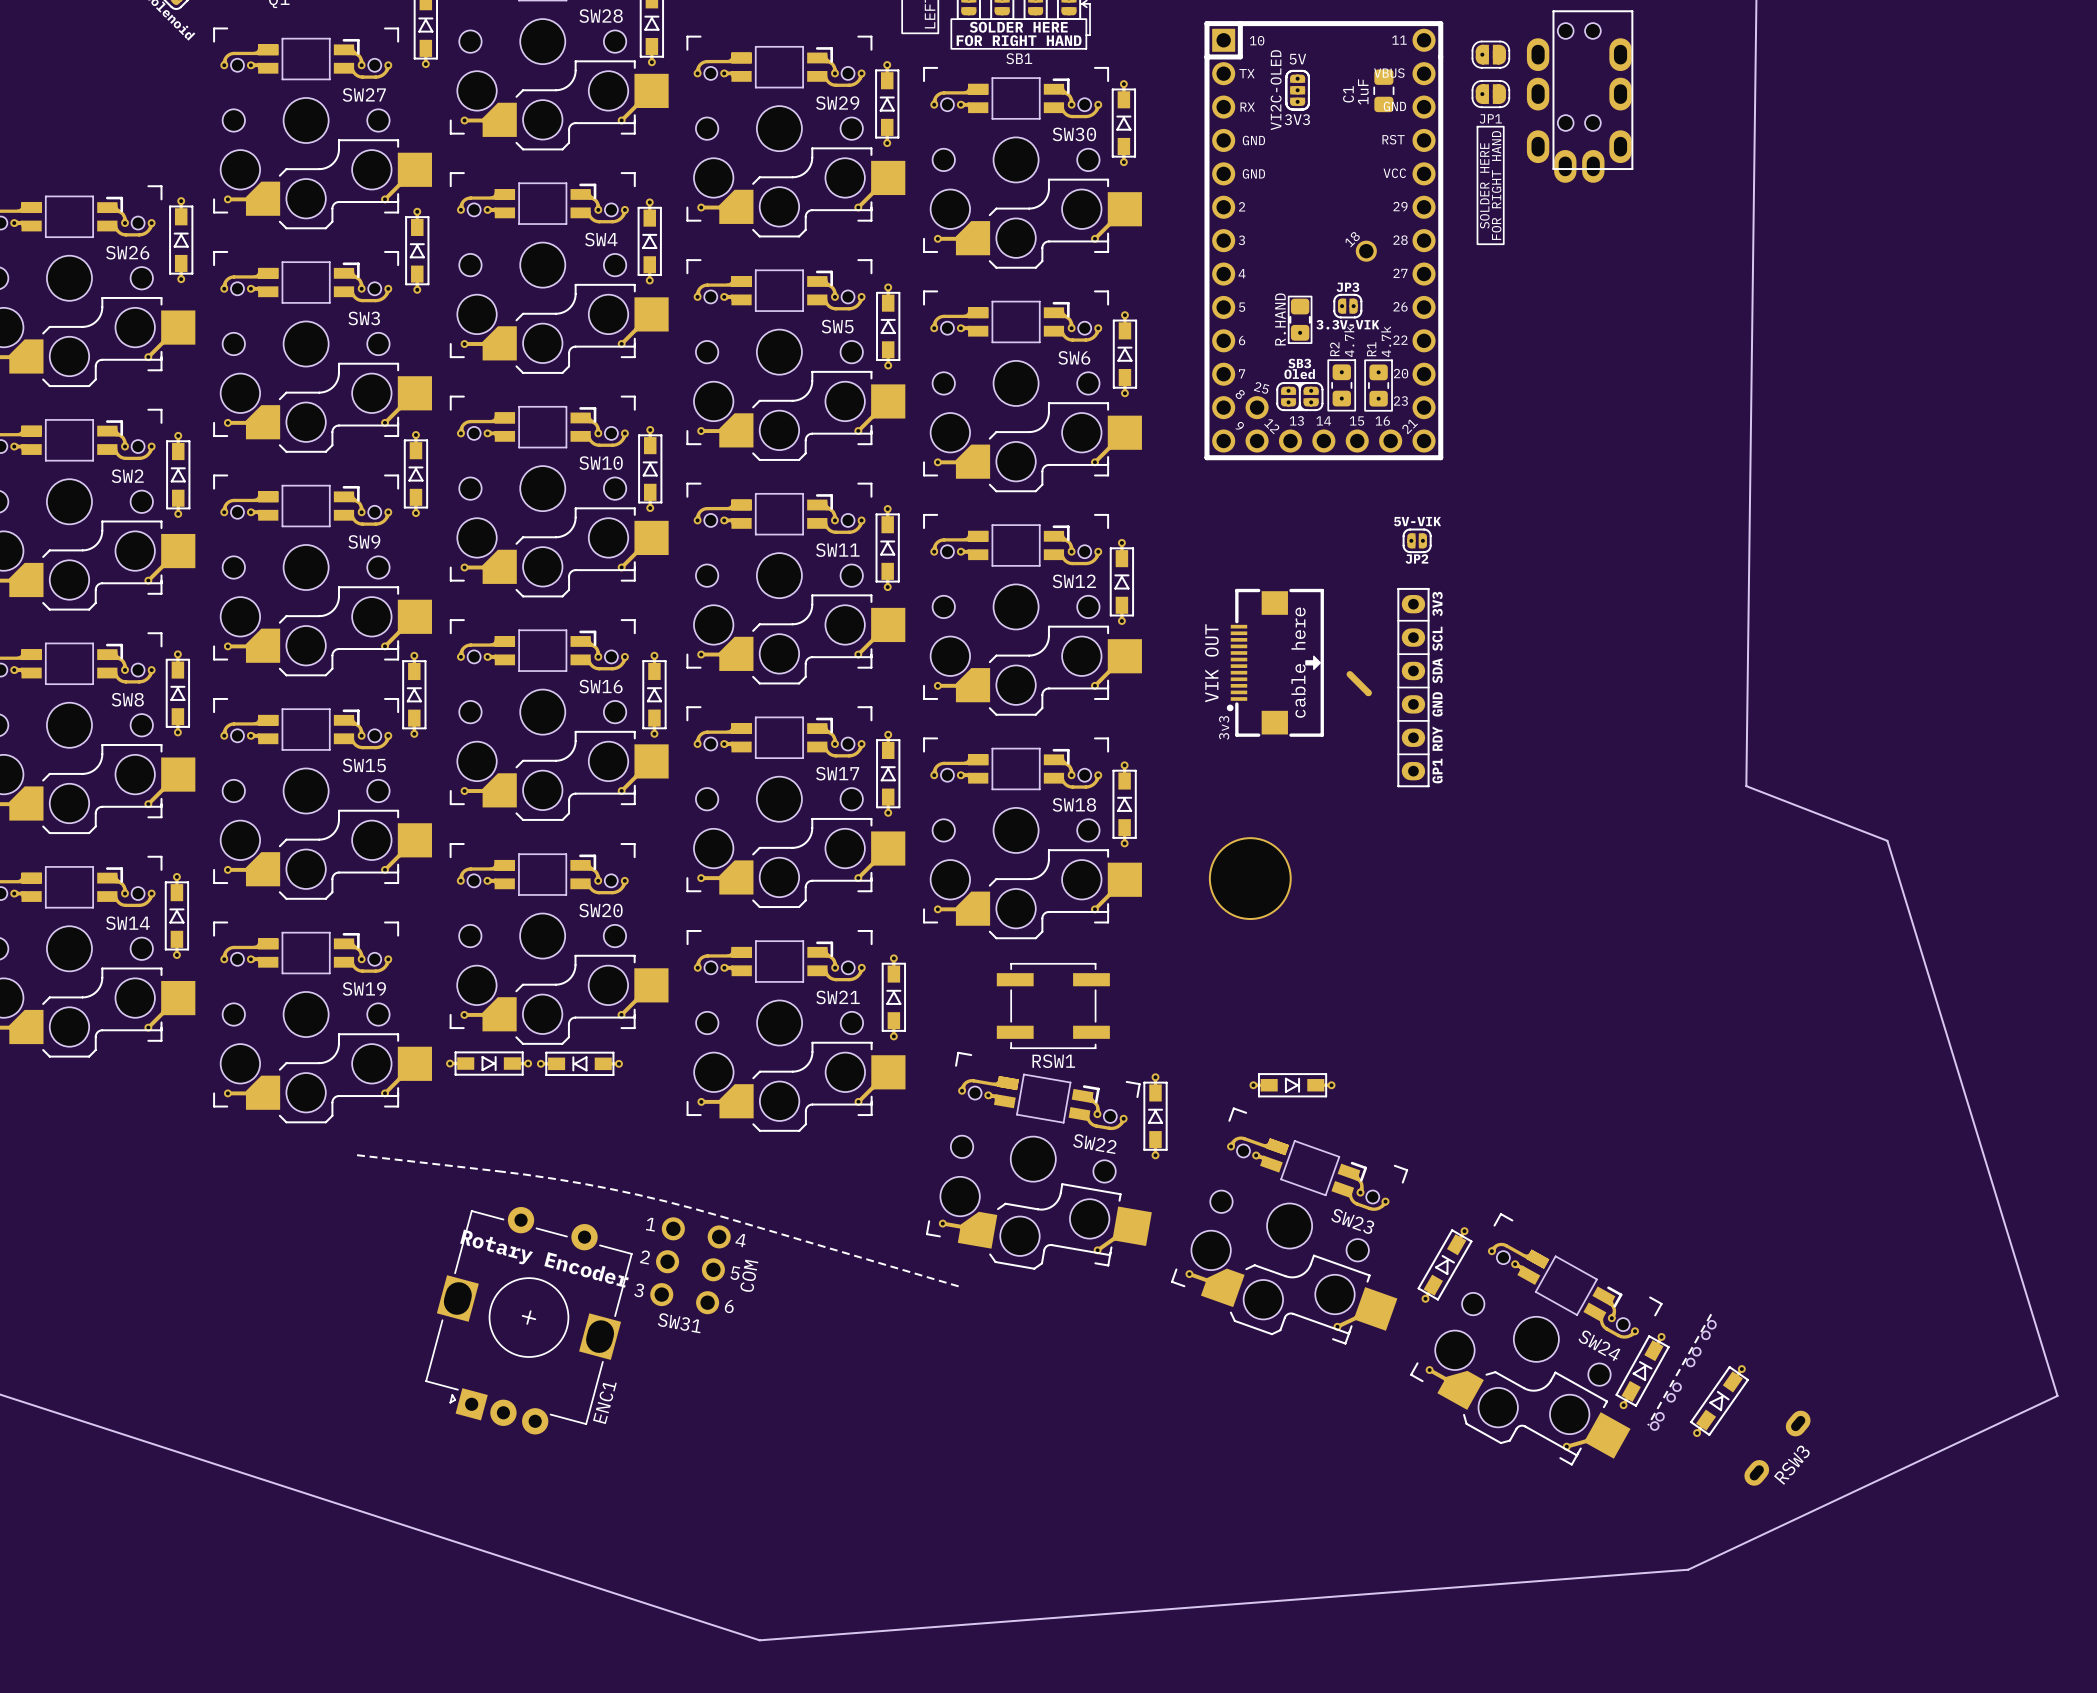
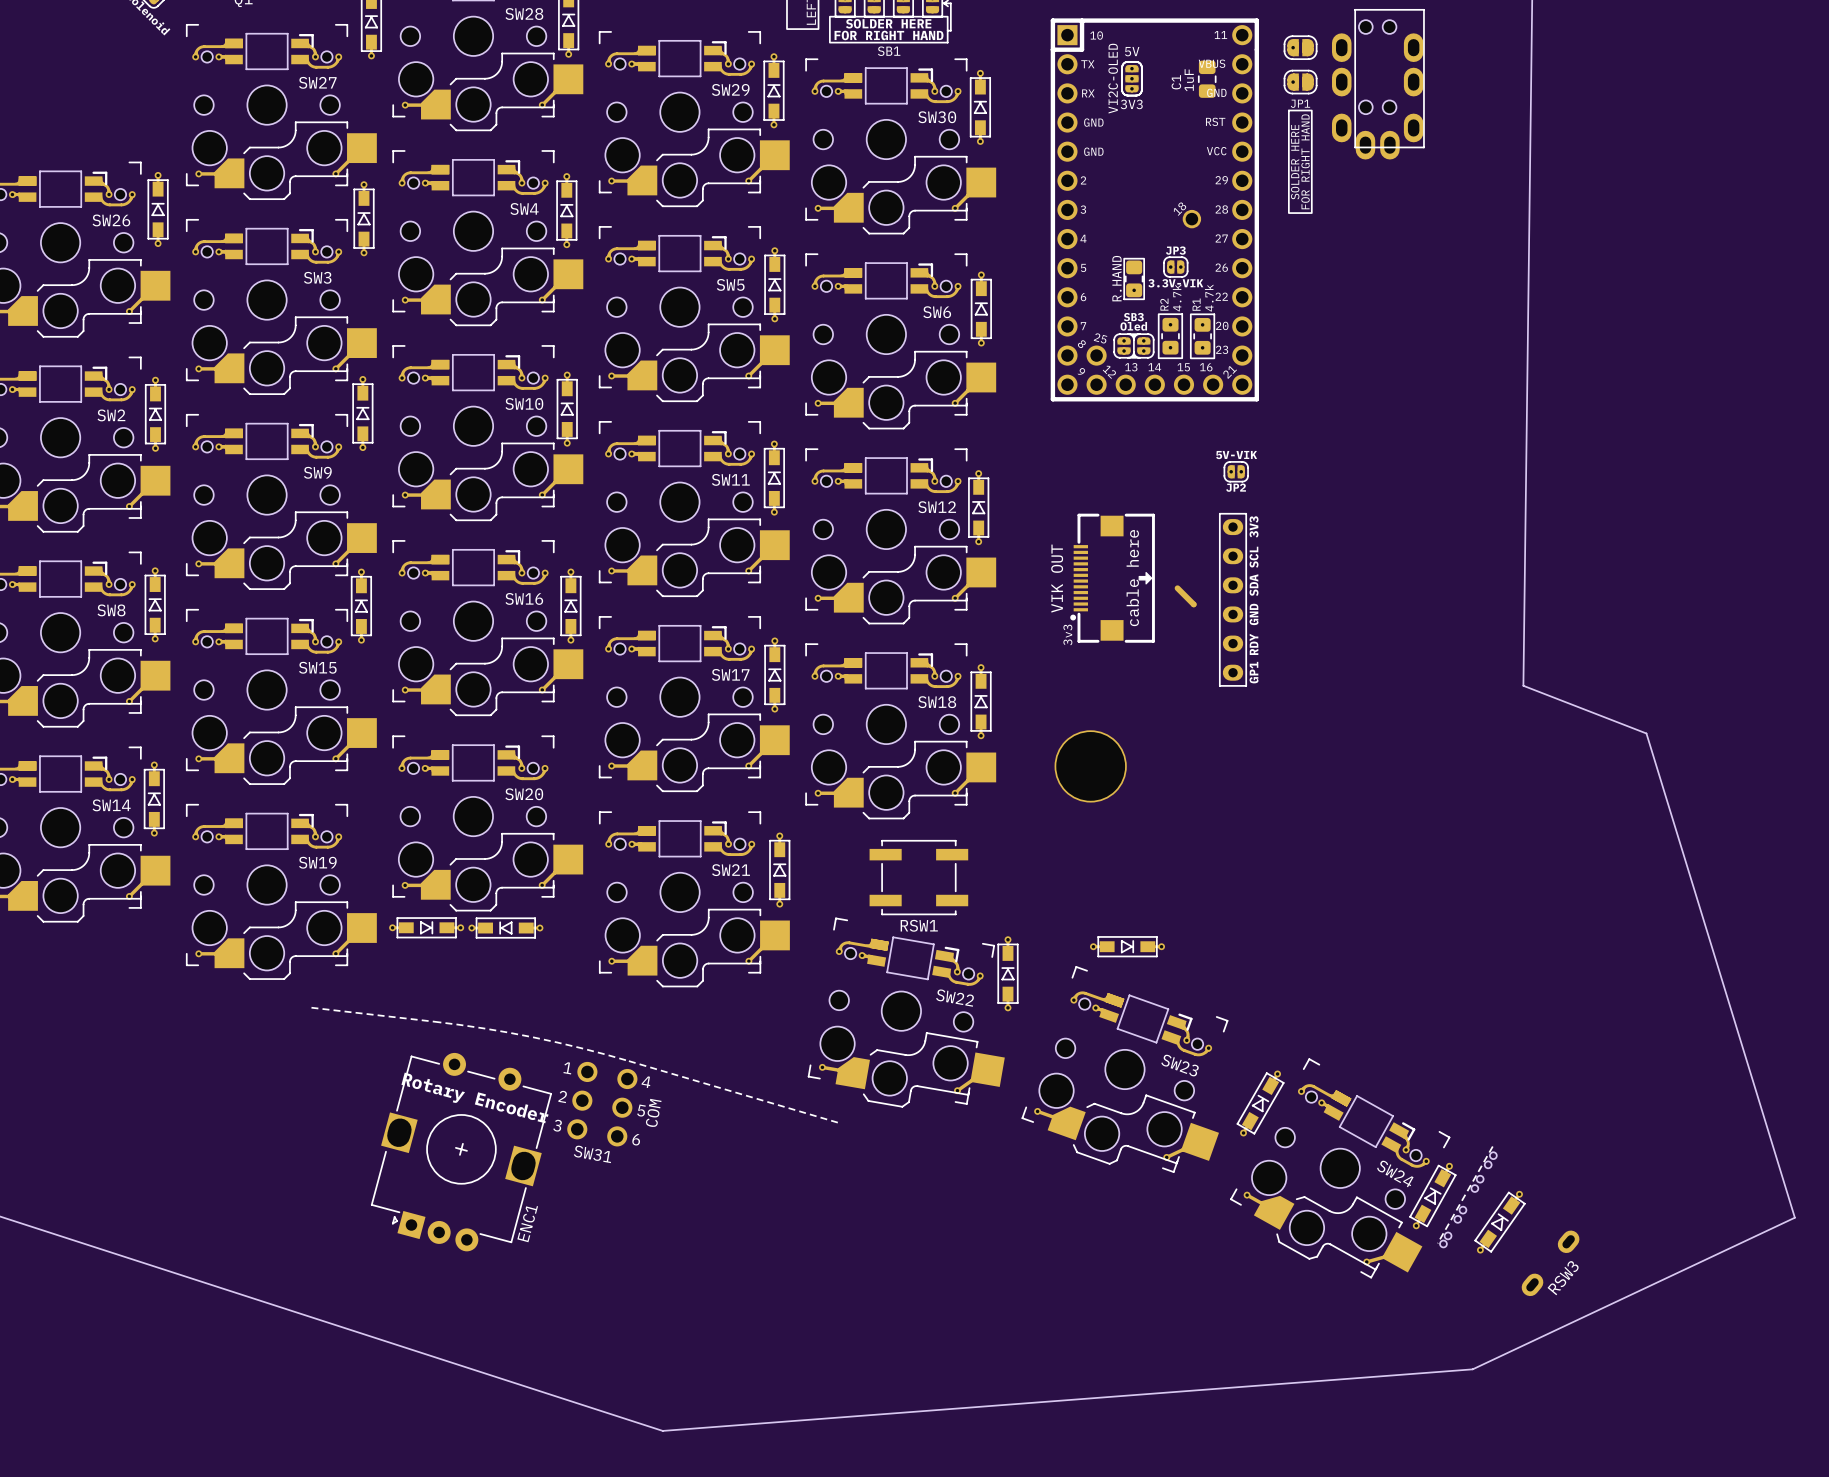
part footprint: [1397, 587, 1430, 788] -> [1218, 512, 1248, 687]

